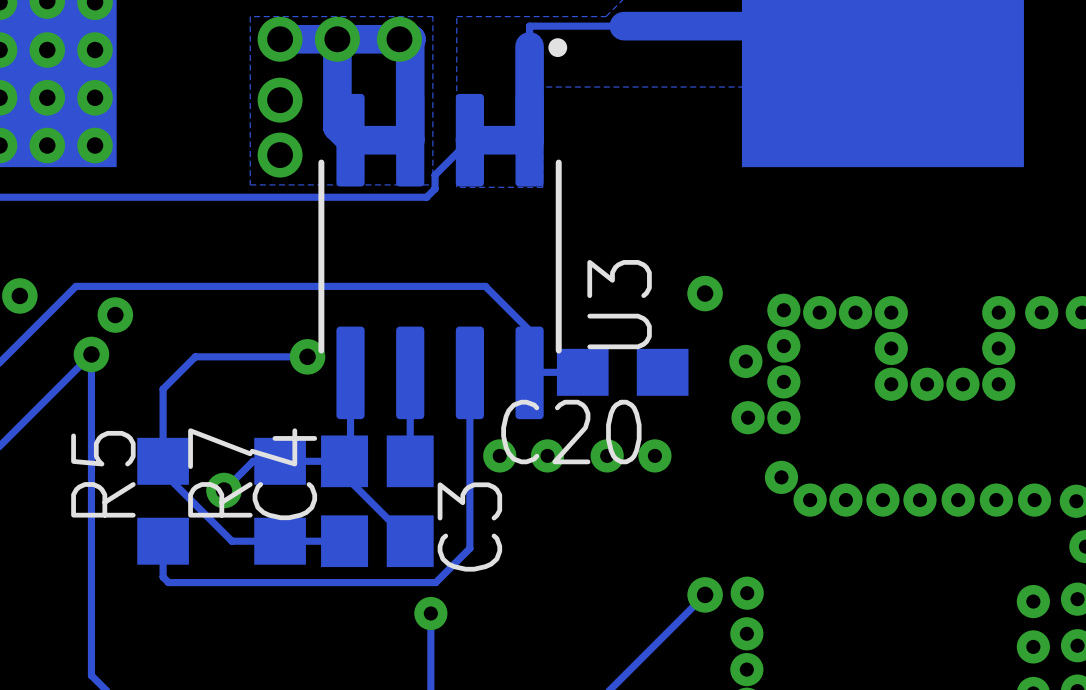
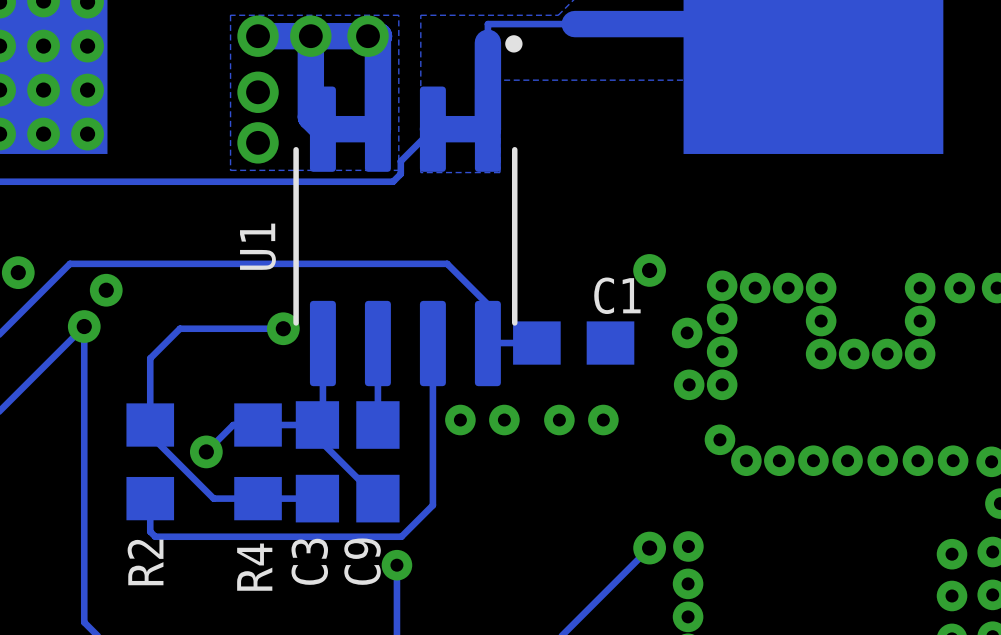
U3 name: U3 (619, 304) -> U1 (257, 246)
C20 name: C20 (571, 432) -> C1 (617, 295)
R7 name: R7 (220, 472) -> R4 (254, 567)
R5 name: R5 (103, 474) -> R2 (145, 562)
C4 name: C4 (283, 474) -> C3 (309, 561)
C3 name: C3 (469, 527) -> C9 (362, 561)

